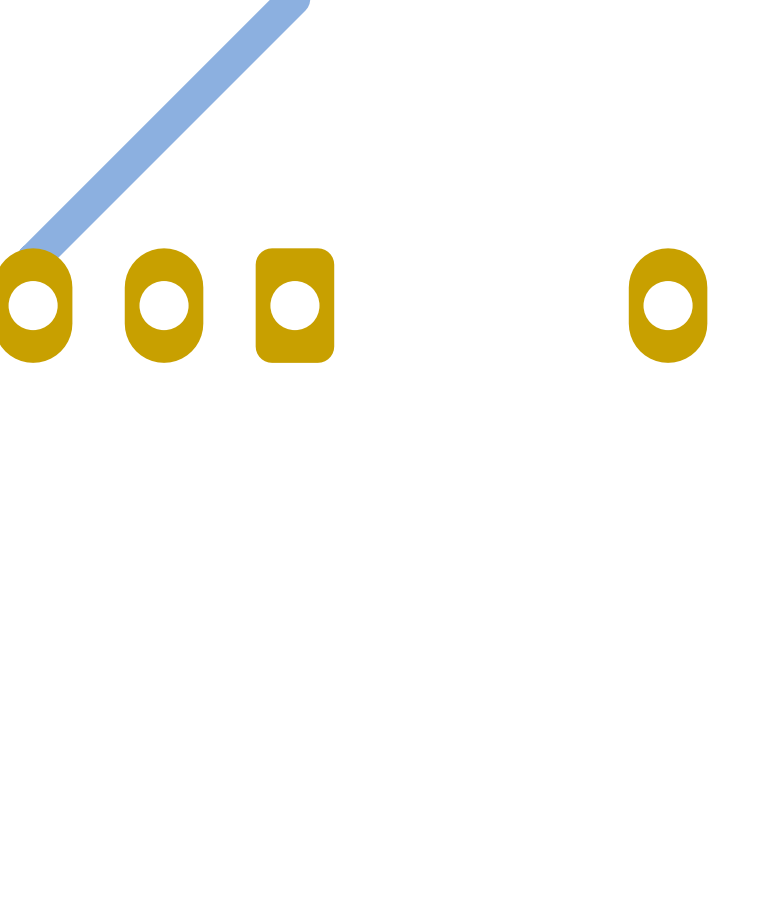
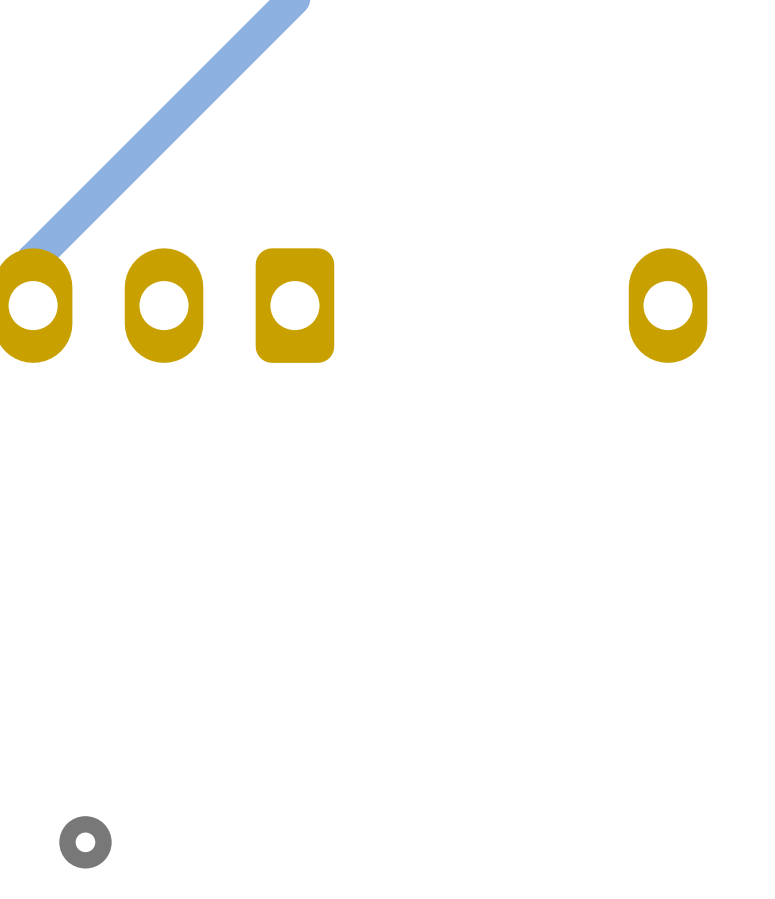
via: none -> (85, 842)

